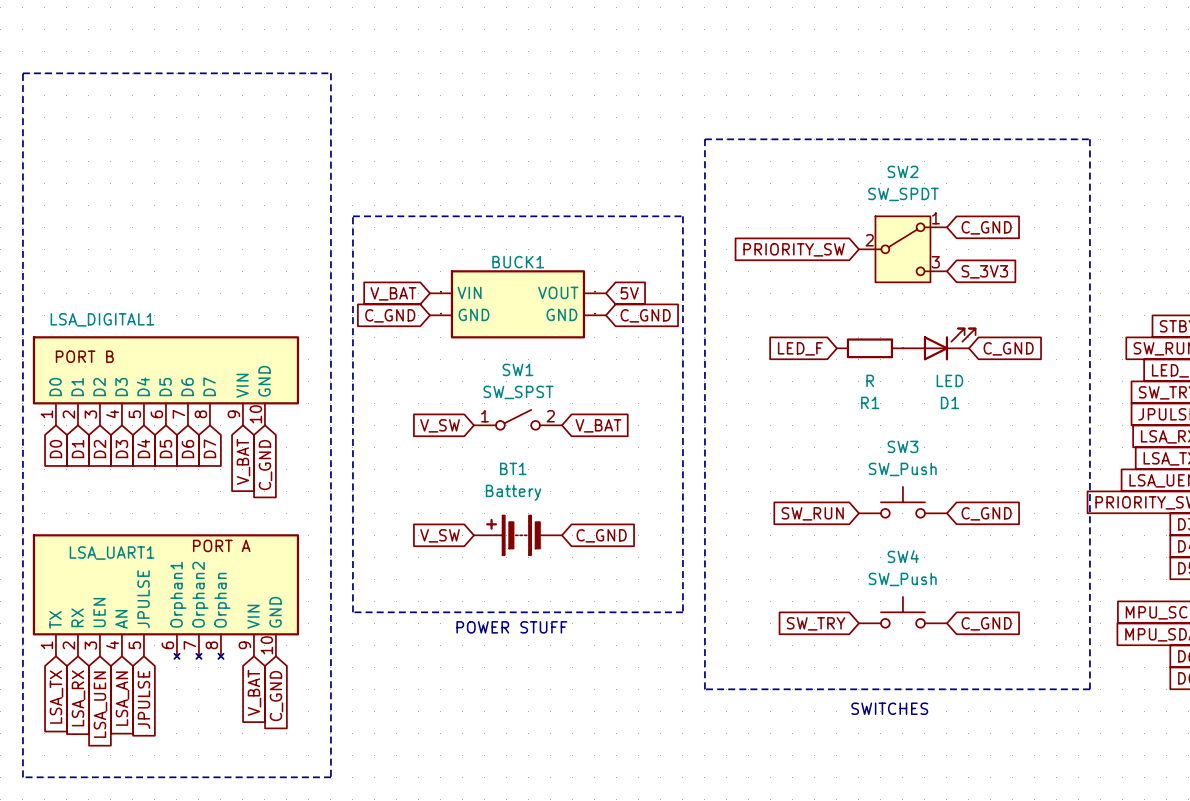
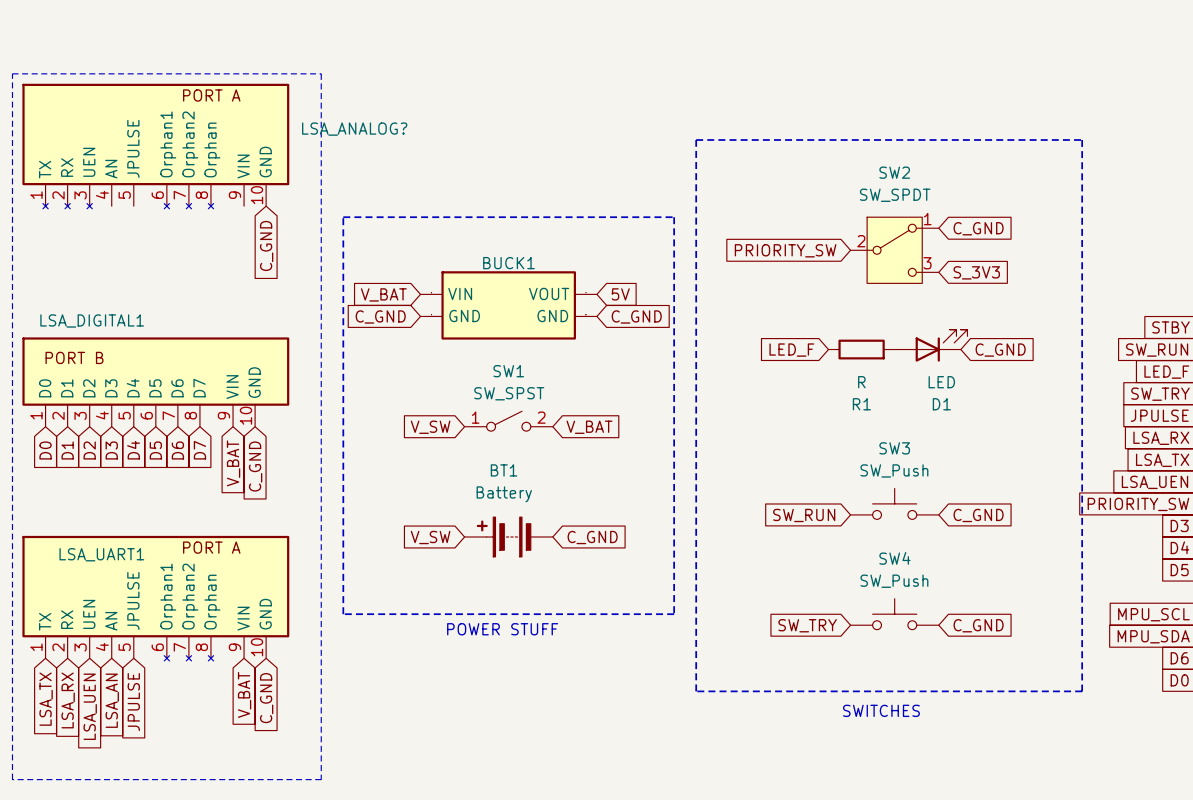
LSA_ANALOG?: none -> (155, 146)
global label: none -> C_GND (266, 245)

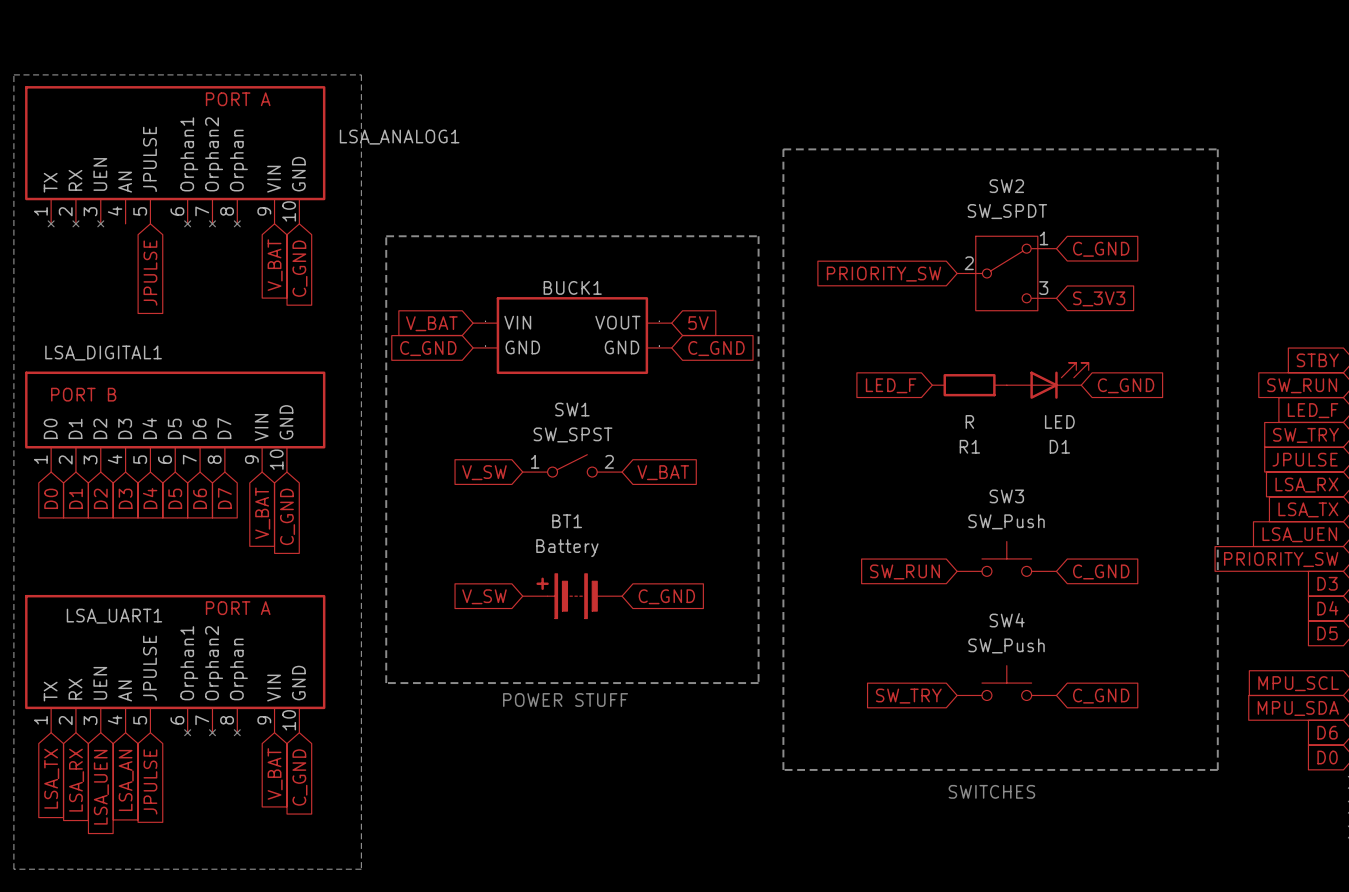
LSA_ANALOG? name: LSA_ANALOG? (354, 129) -> LSA_ANALOG1 (399, 137)
global label: none -> V_BAT (275, 265)
global label: none -> JPULSE (150, 273)

